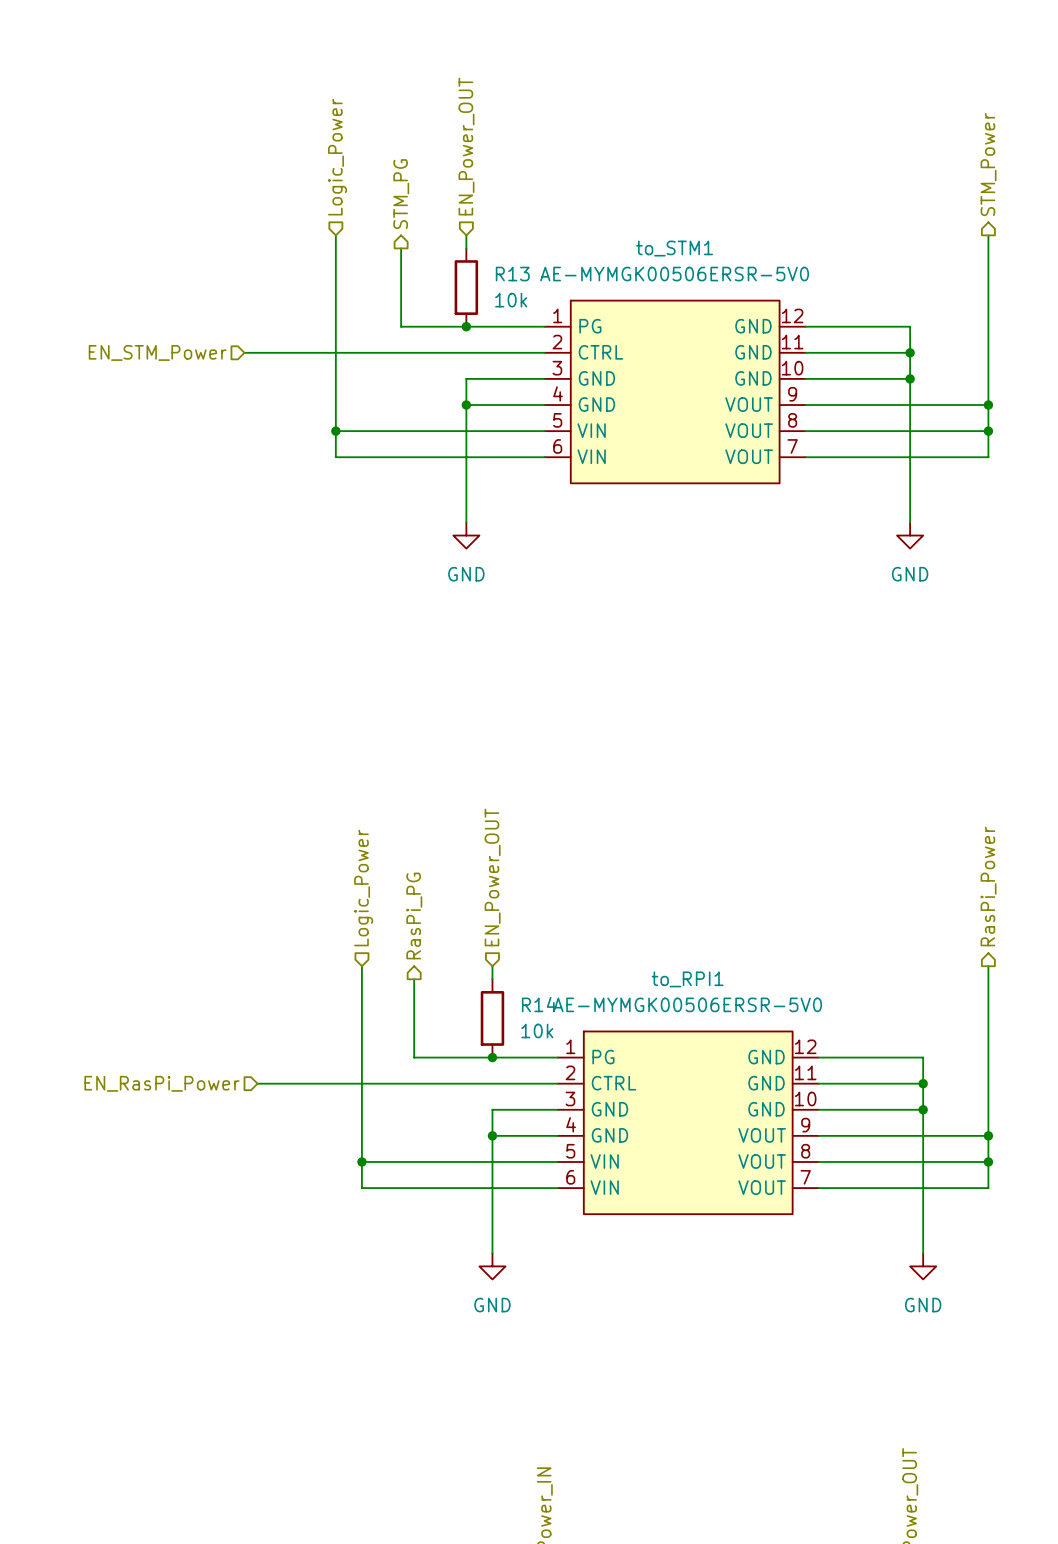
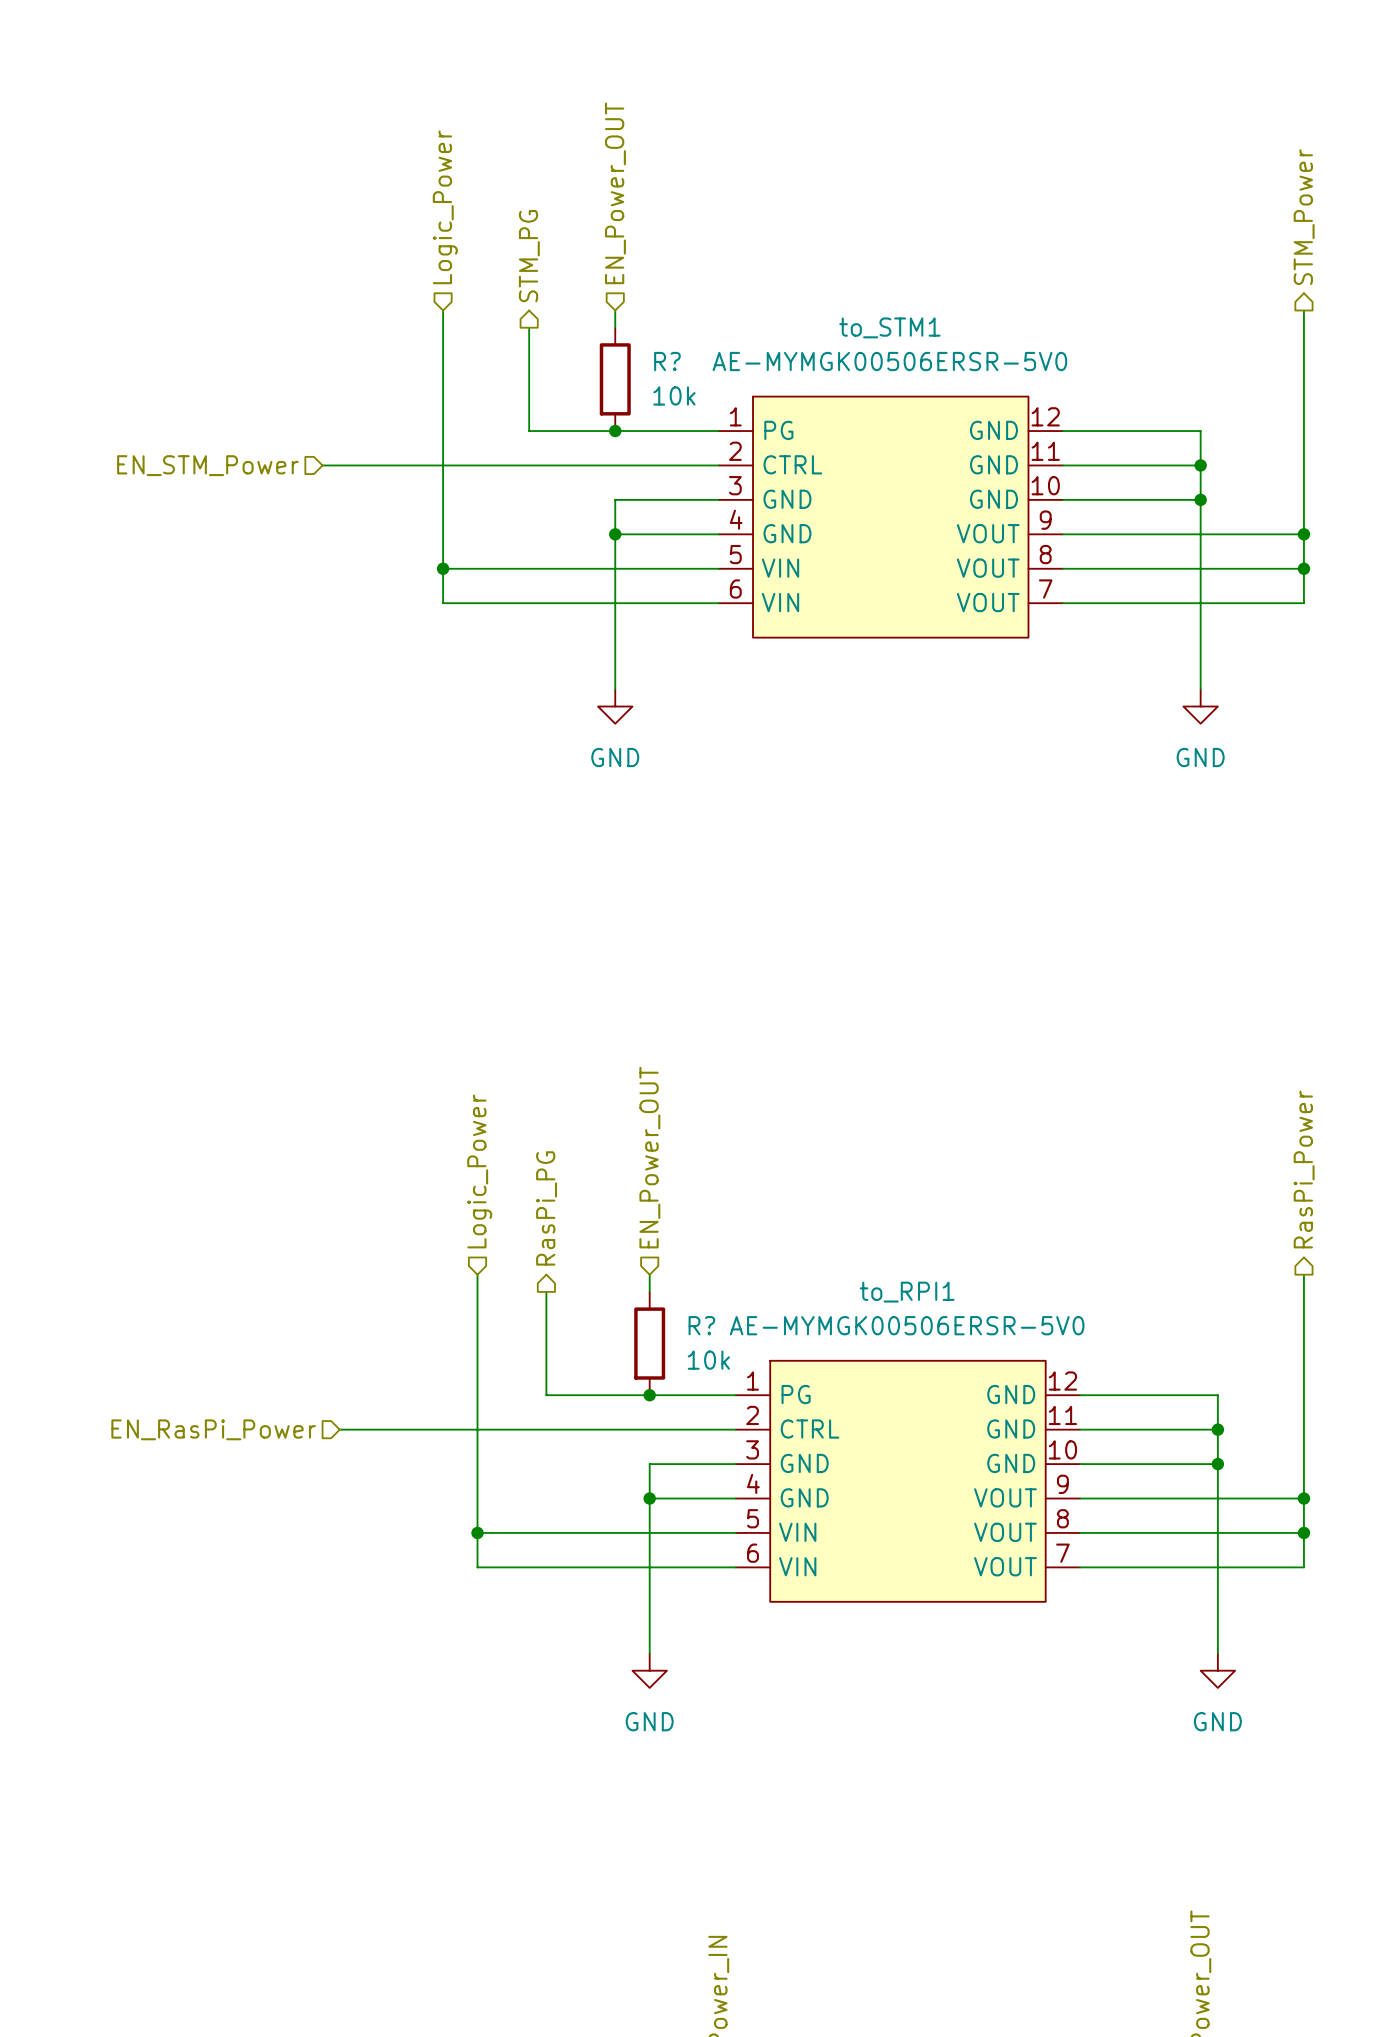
R13 name: R13 (512, 274) -> R? (667, 361)
R14 name: R14 (539, 1004) -> R? (701, 1325)

